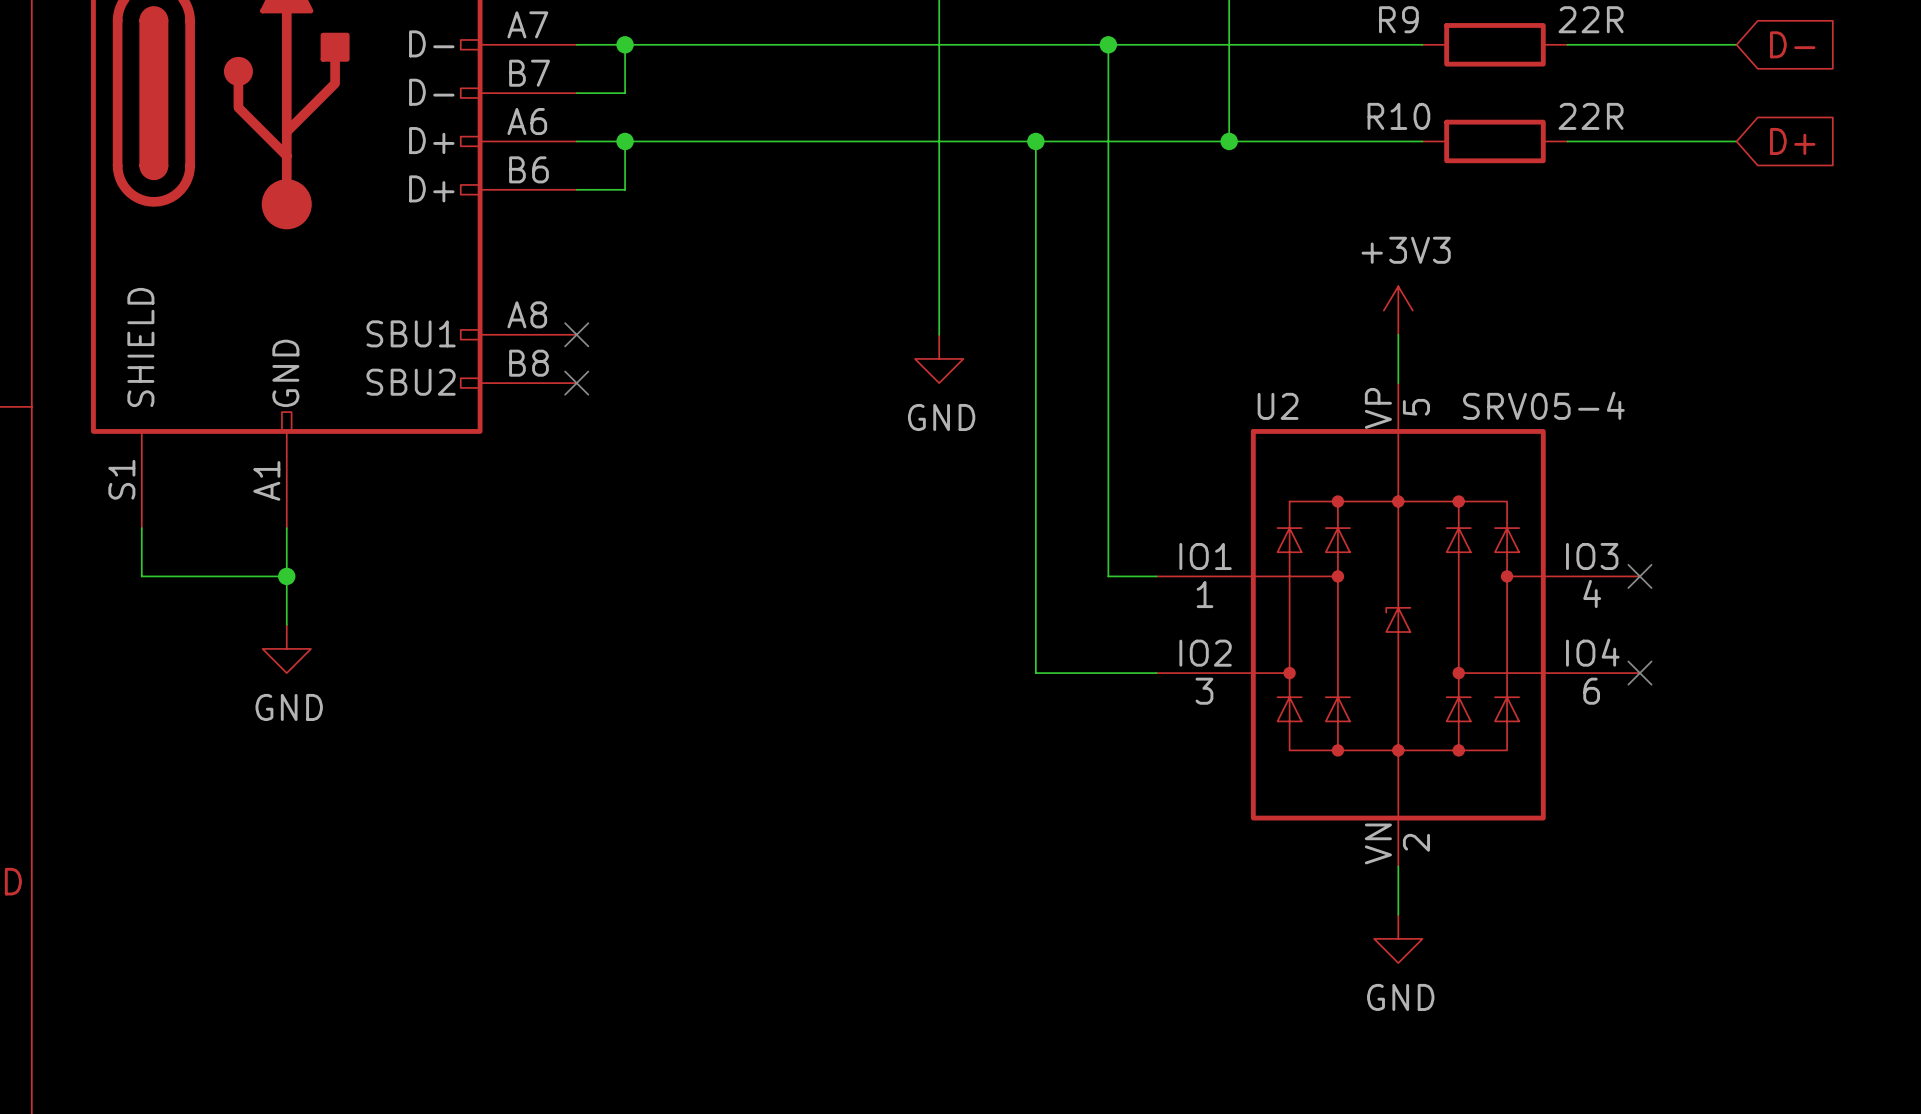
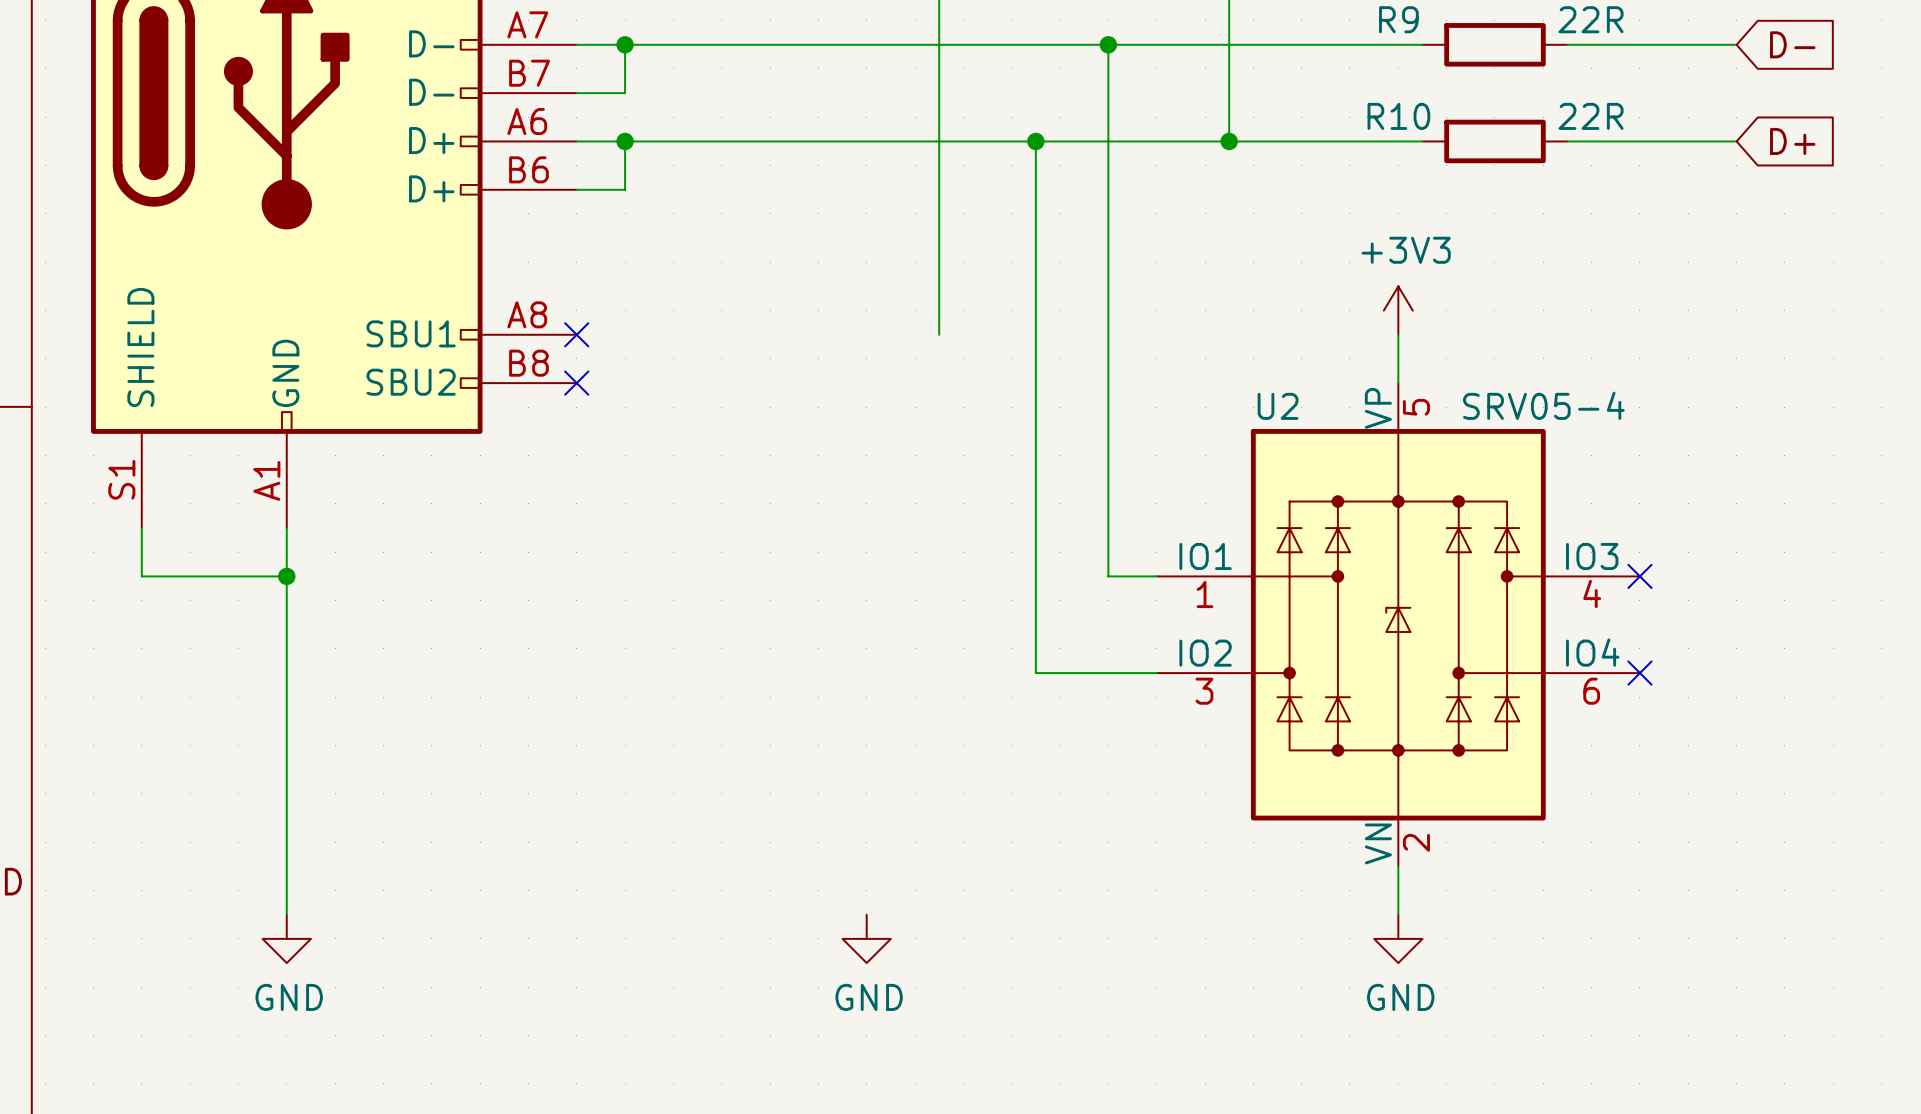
power symbol: GND (939, 358) -> none
wire: none -> (286, 624) (286, 914)
power symbol position: GND (286, 648) -> GND (286, 938)
power symbol: none -> GND (866, 938)

